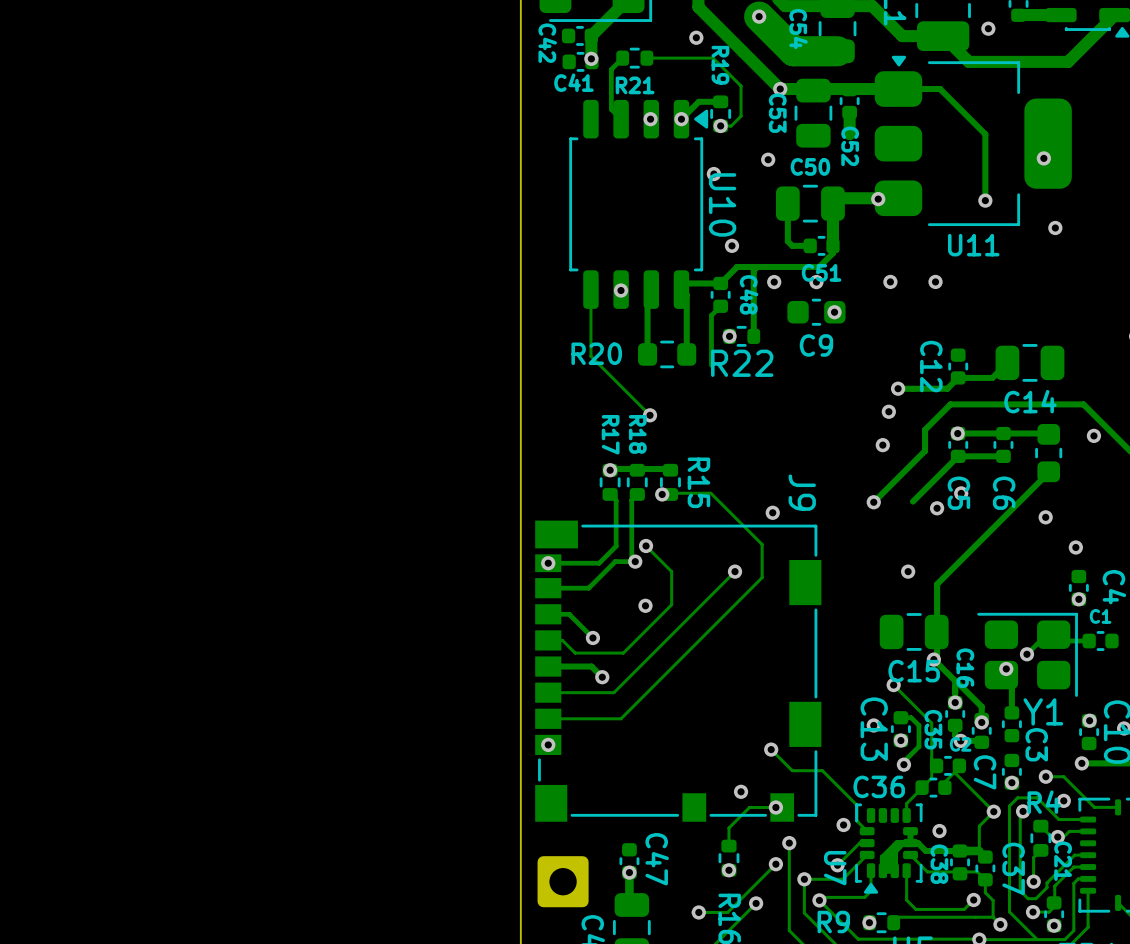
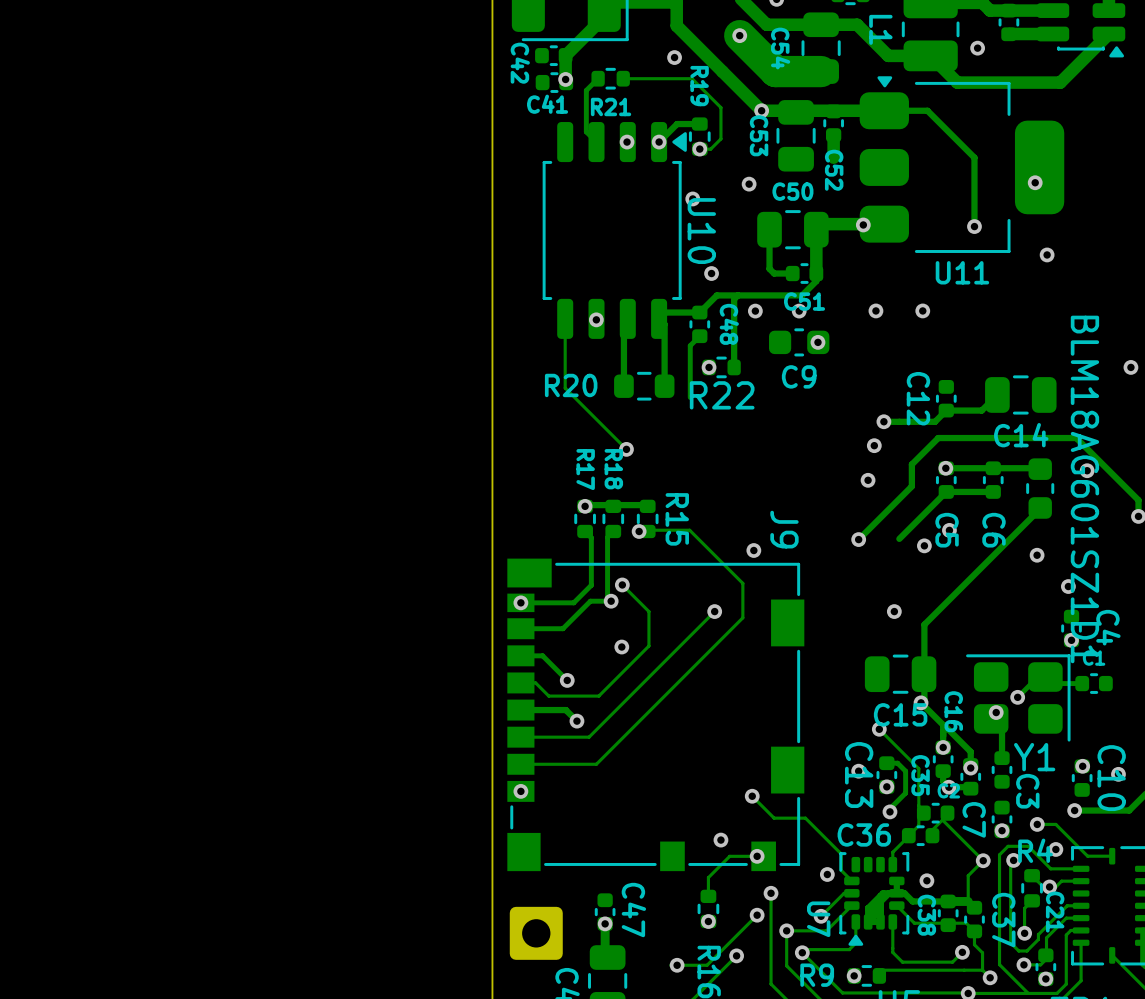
BLM18AG601SZ1D1 name: none -> BLM18AG601SZ1D1 (1084, 489)

